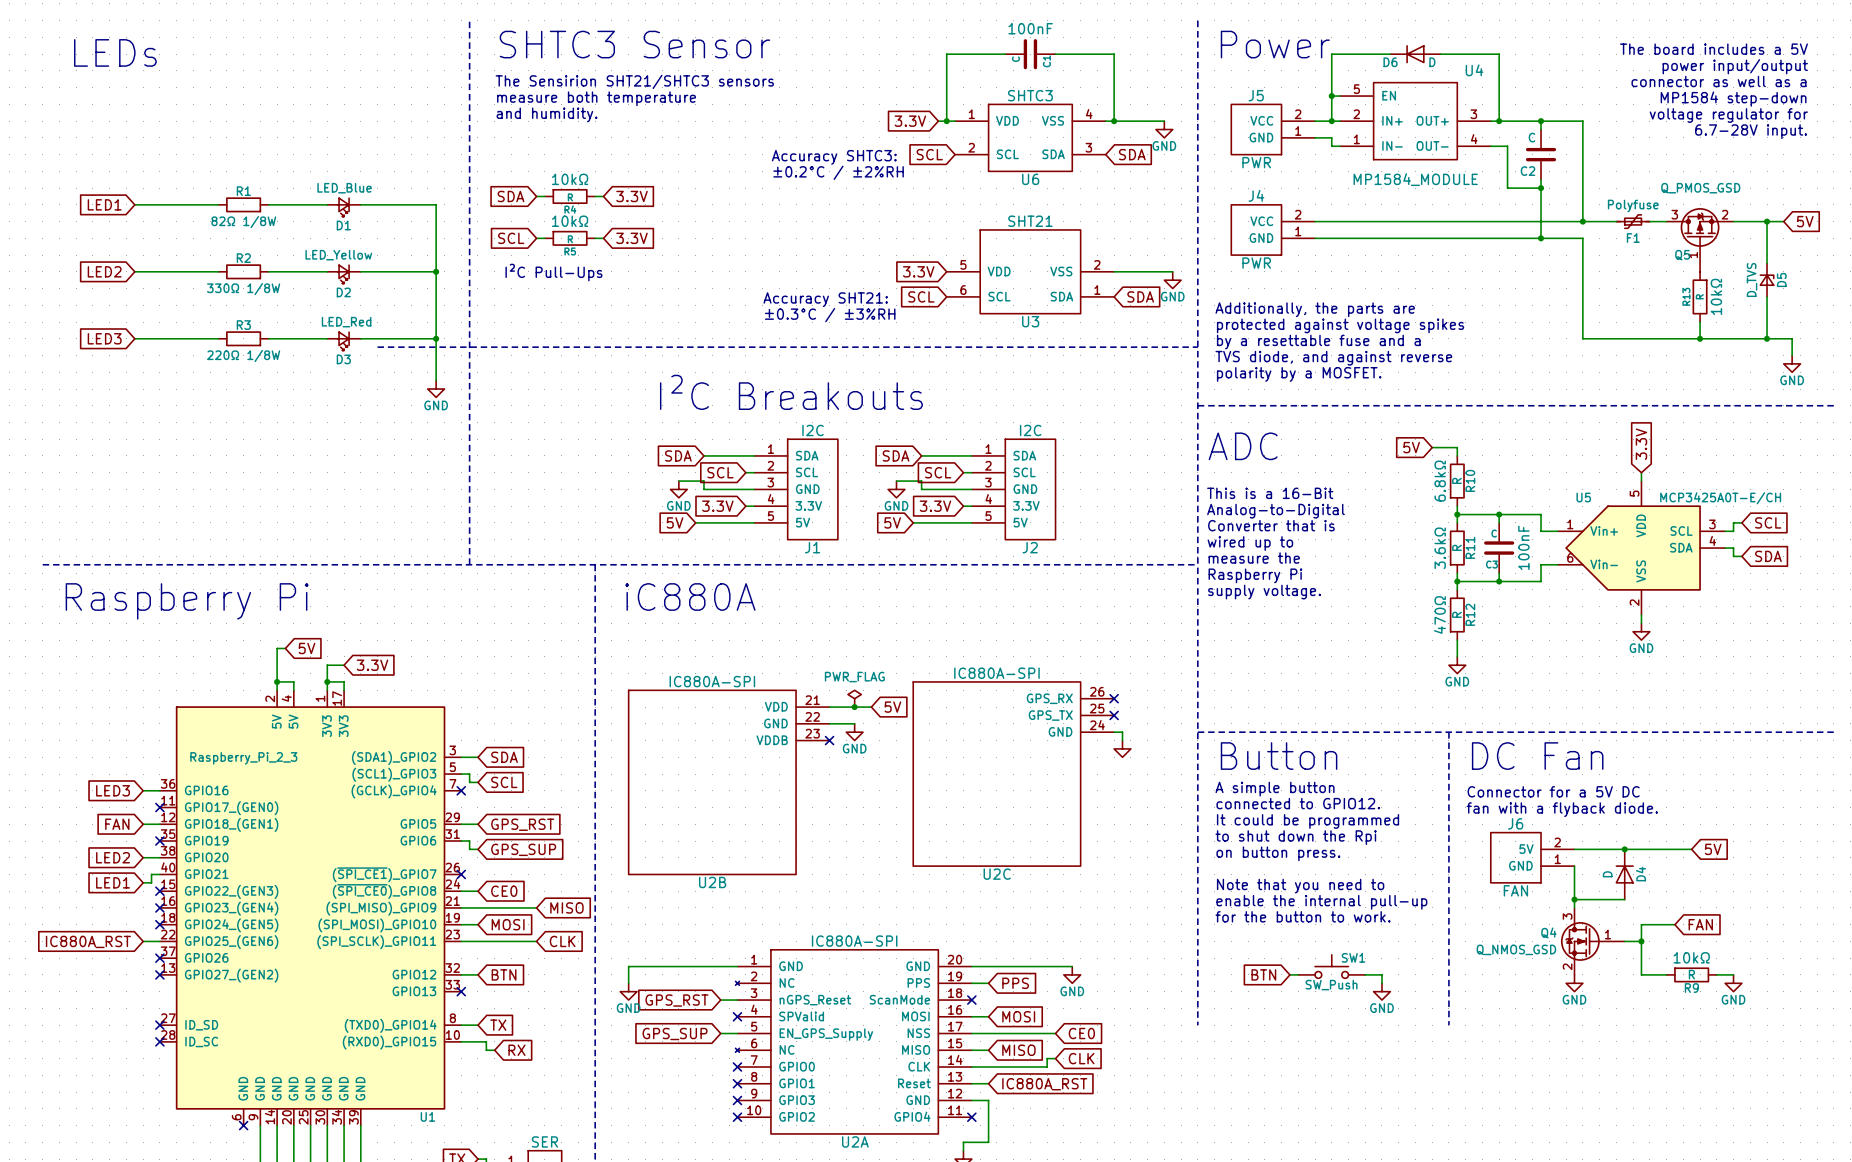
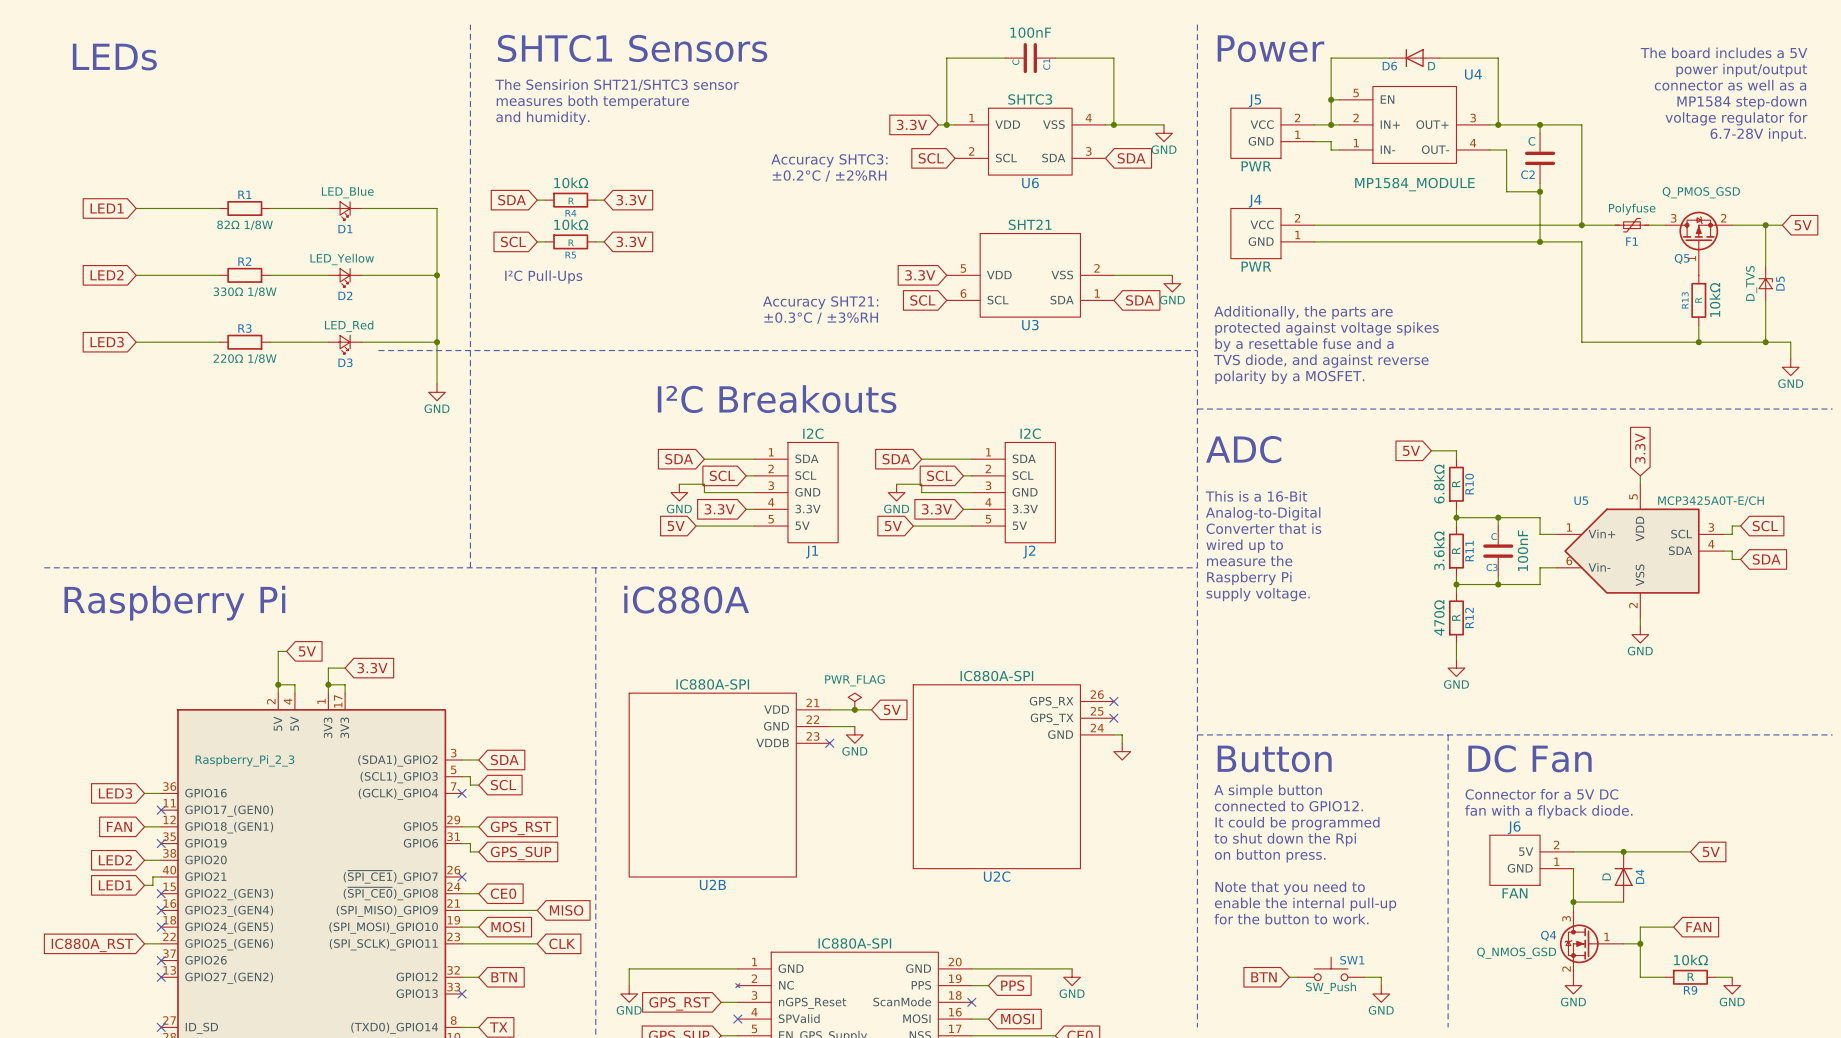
text: SHTC3 Sensor (634, 44) -> SHTC1 Sensors (632, 48)
text: The Sensirion SHT21/SHTC3 sensors (634, 81) -> The Sensirion SHT21/SHTC3 sensor (617, 85)
text: measure both temperature (596, 98) -> measures both temperature (592, 102)

